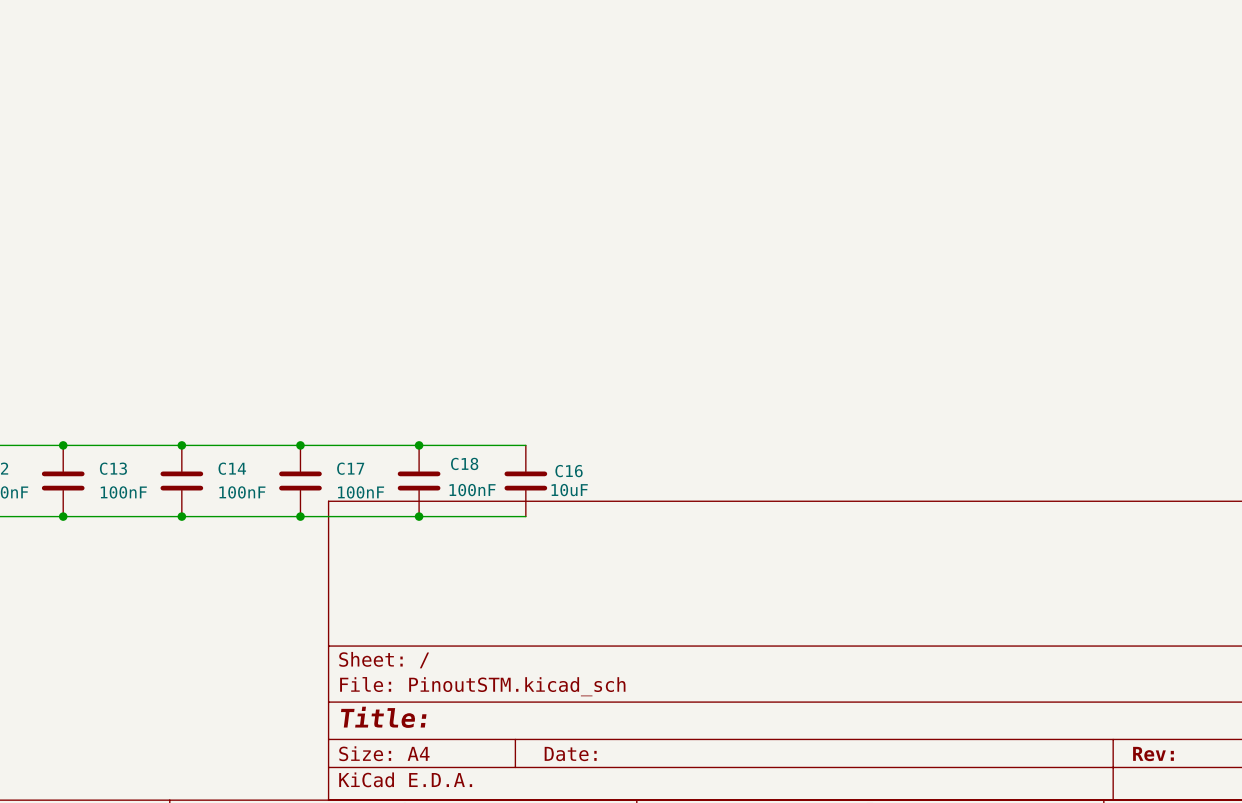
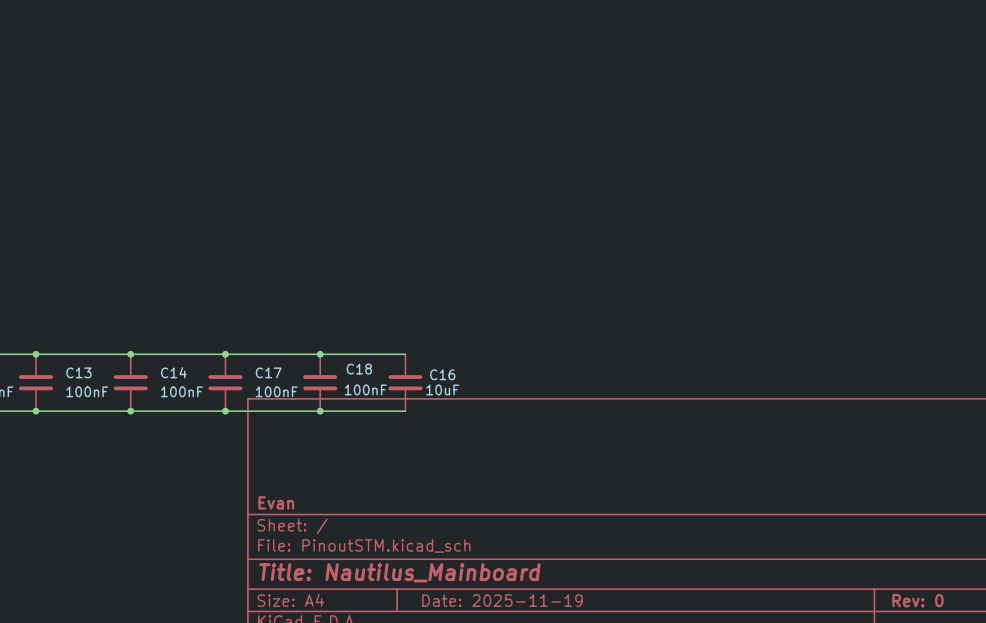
title block: none -> Evan (276, 502)
title block: Title: (383, 717) -> Title: Nautilus_Mainboard (399, 572)
title block: Date: (570, 754) -> Date: 2025-11-19 (502, 600)
title block: Rev: (1153, 754) -> Rev: 0 (918, 600)

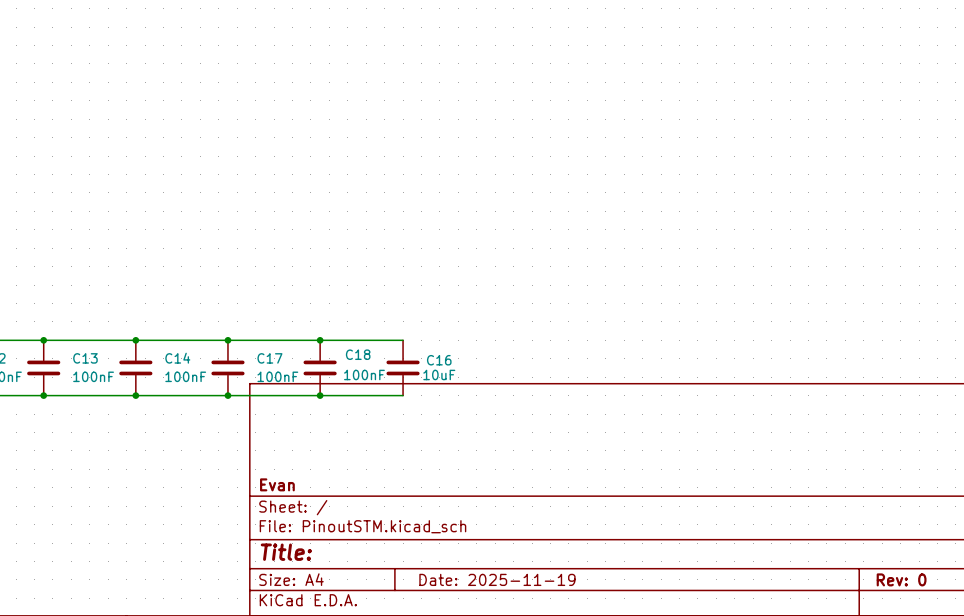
title block: Title: Nautilus_Mainboard (399, 572) -> Title: (286, 552)

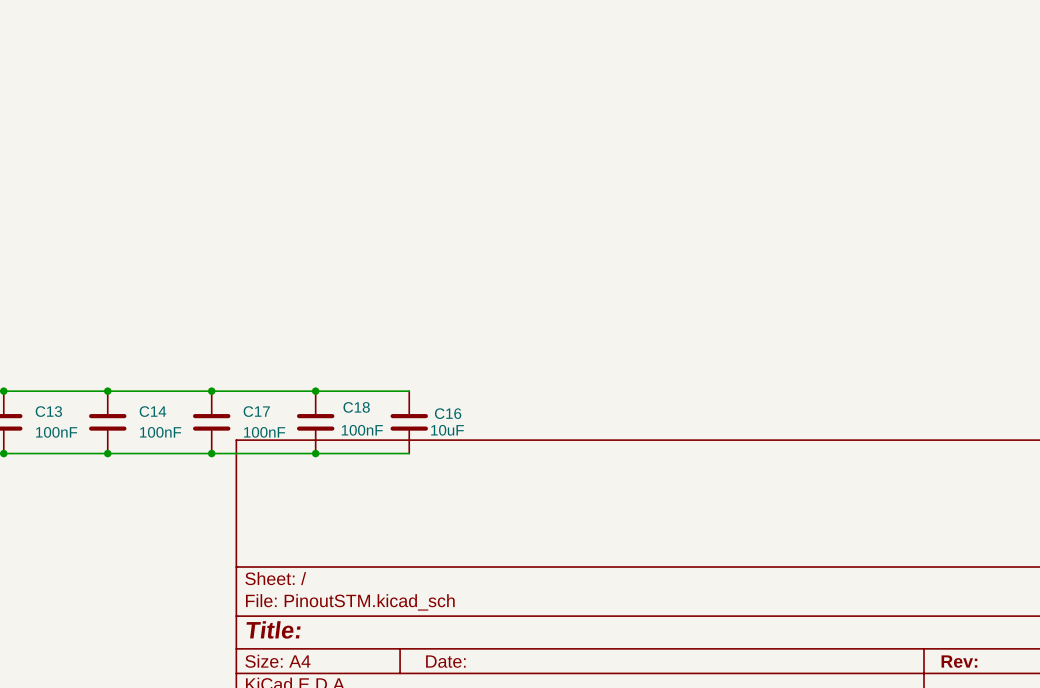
title block: Evan (277, 484) -> none
title block: Date: 2025-11-19 (497, 579) -> Date: (445, 661)
title block: Rev: 0 (901, 579) -> Rev: (959, 661)

